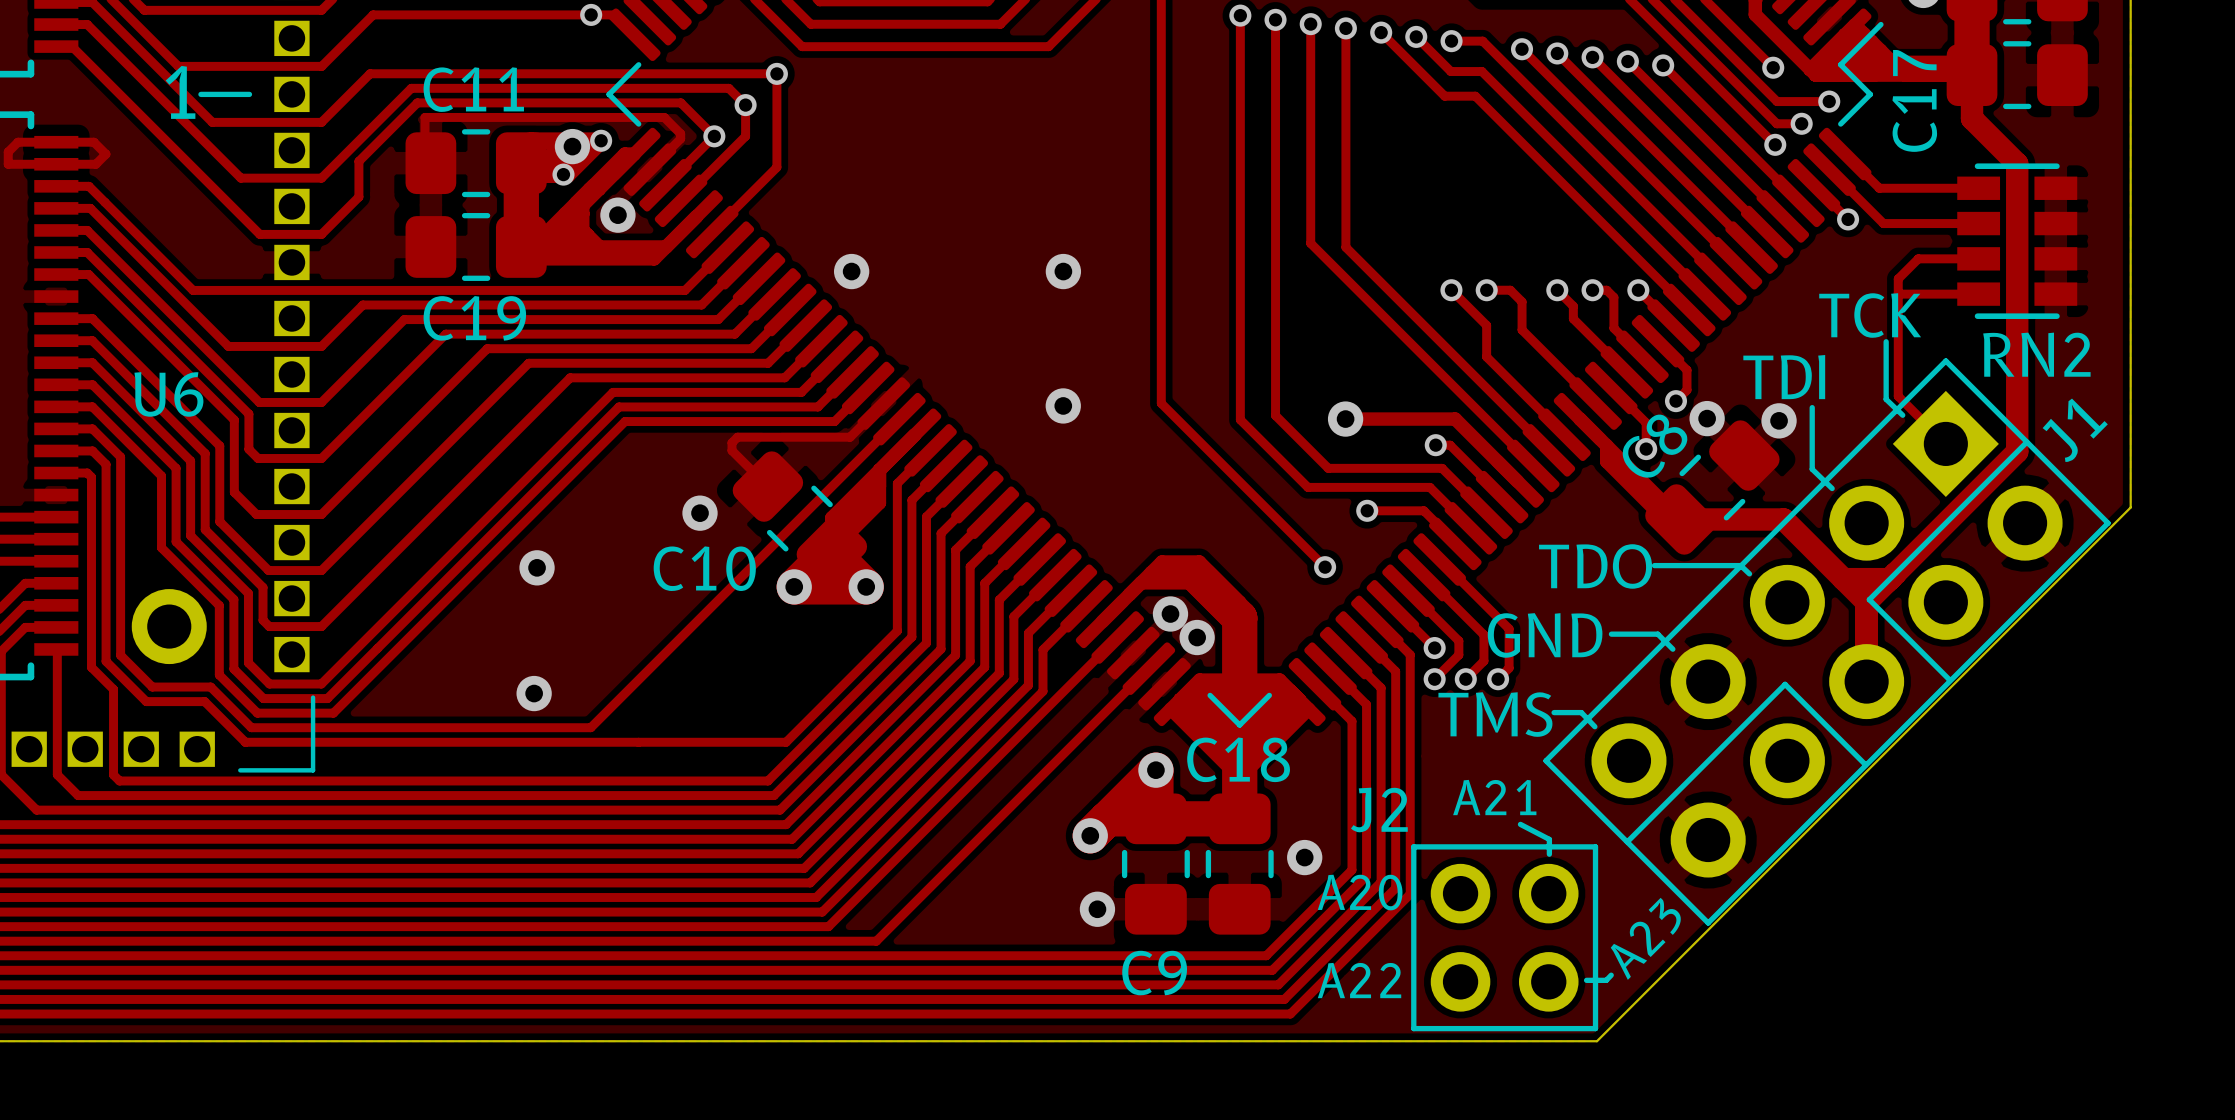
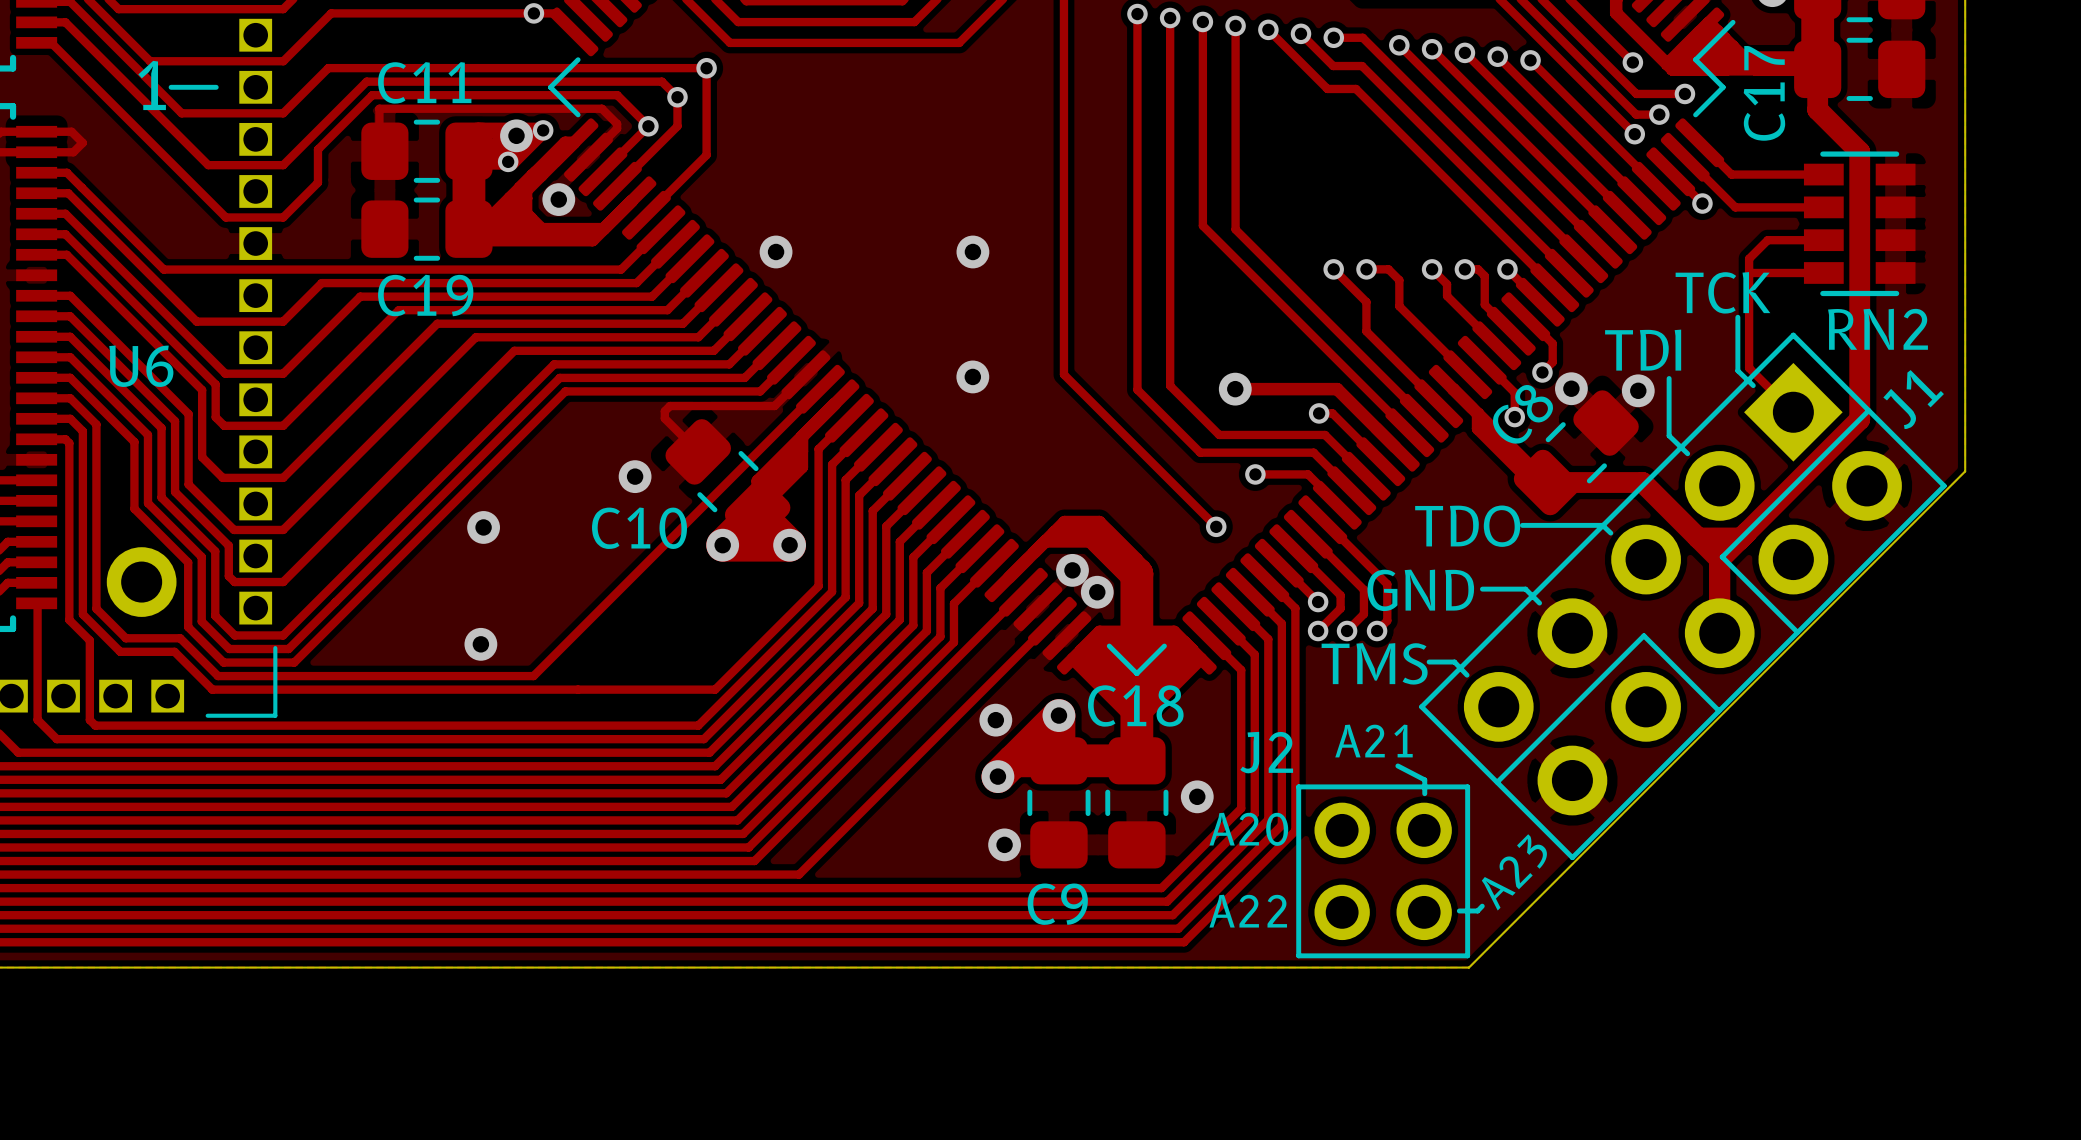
via: none -> (995, 720)

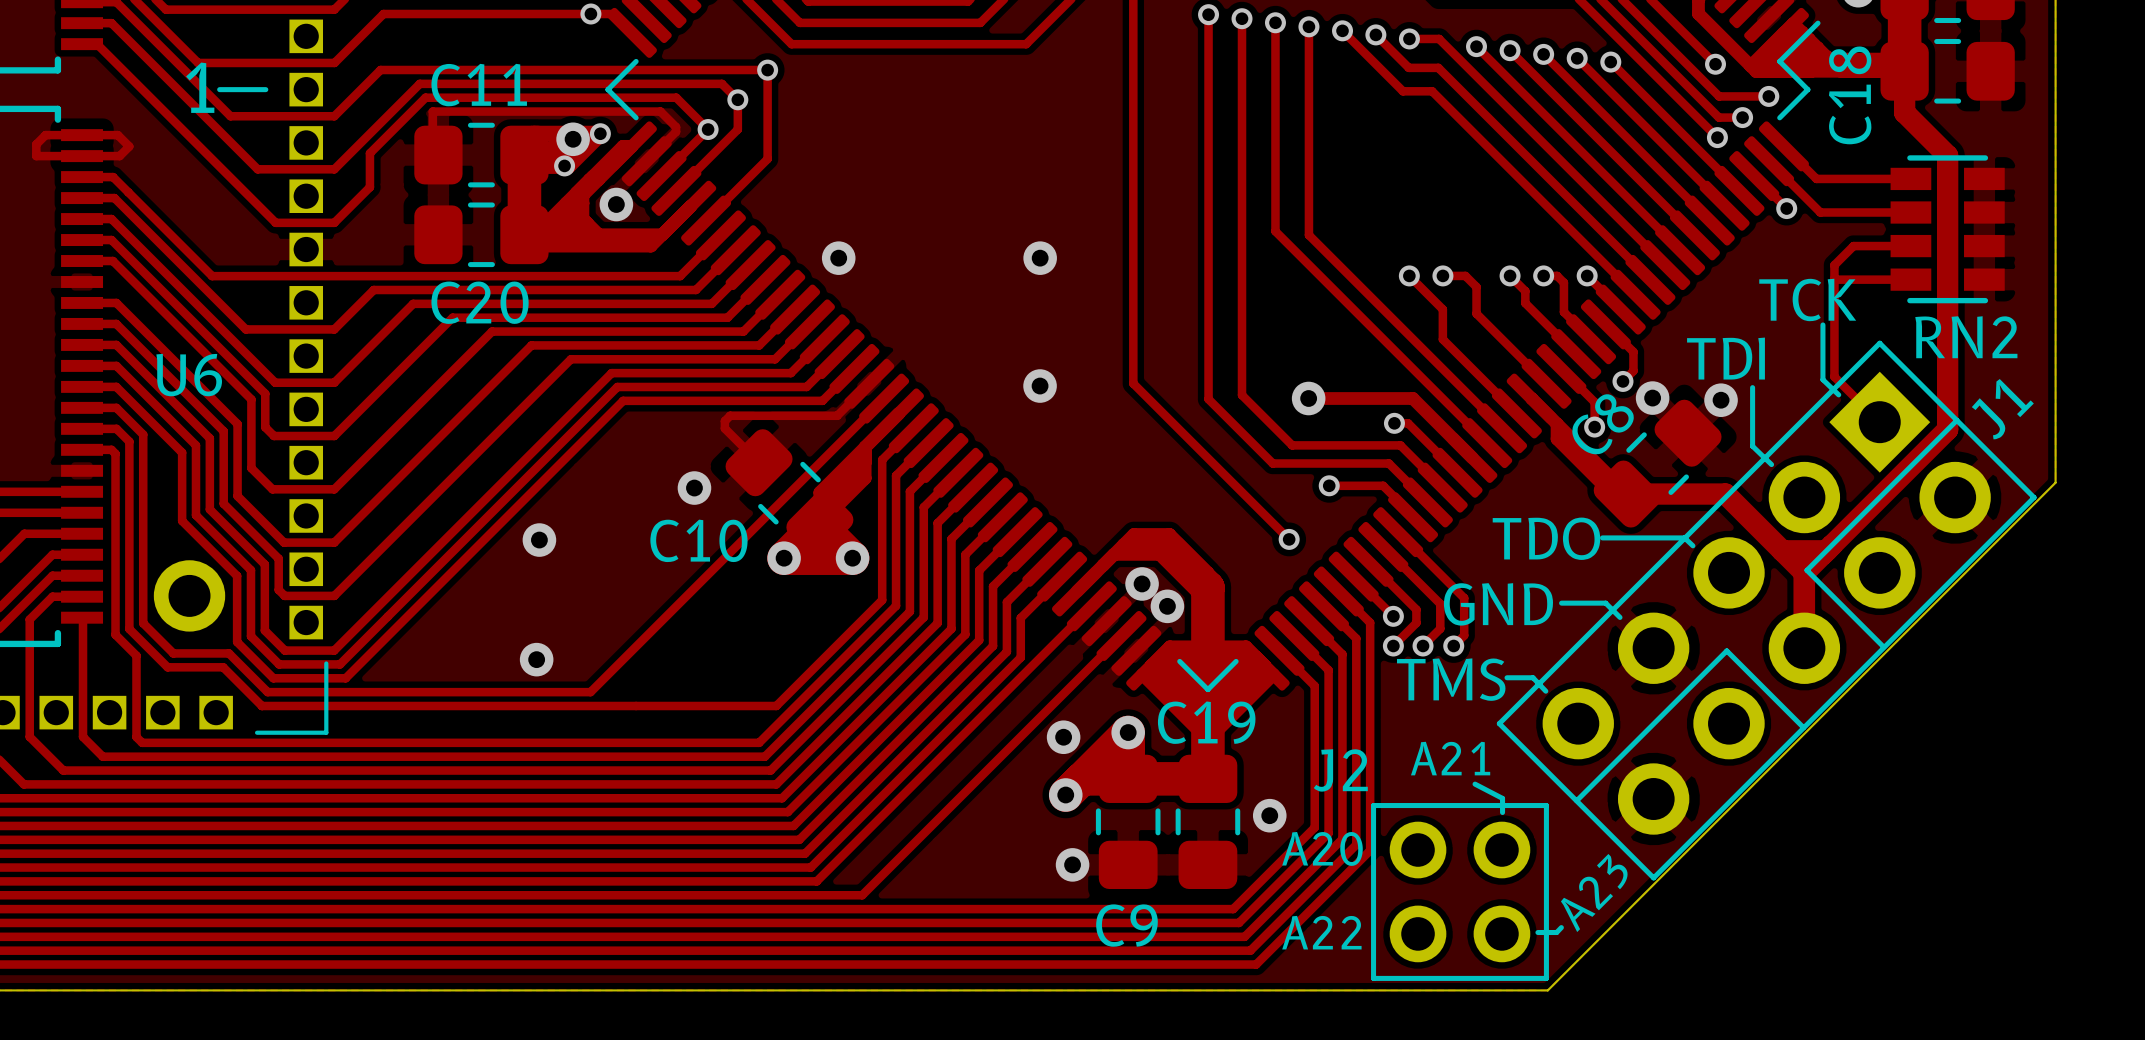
C17 name: C17 (1764, 93) -> C18 (1850, 95)
C19 name: C19 (425, 295) -> C20 (480, 302)
C18 name: C18 (1135, 705) -> C19 (1206, 722)

